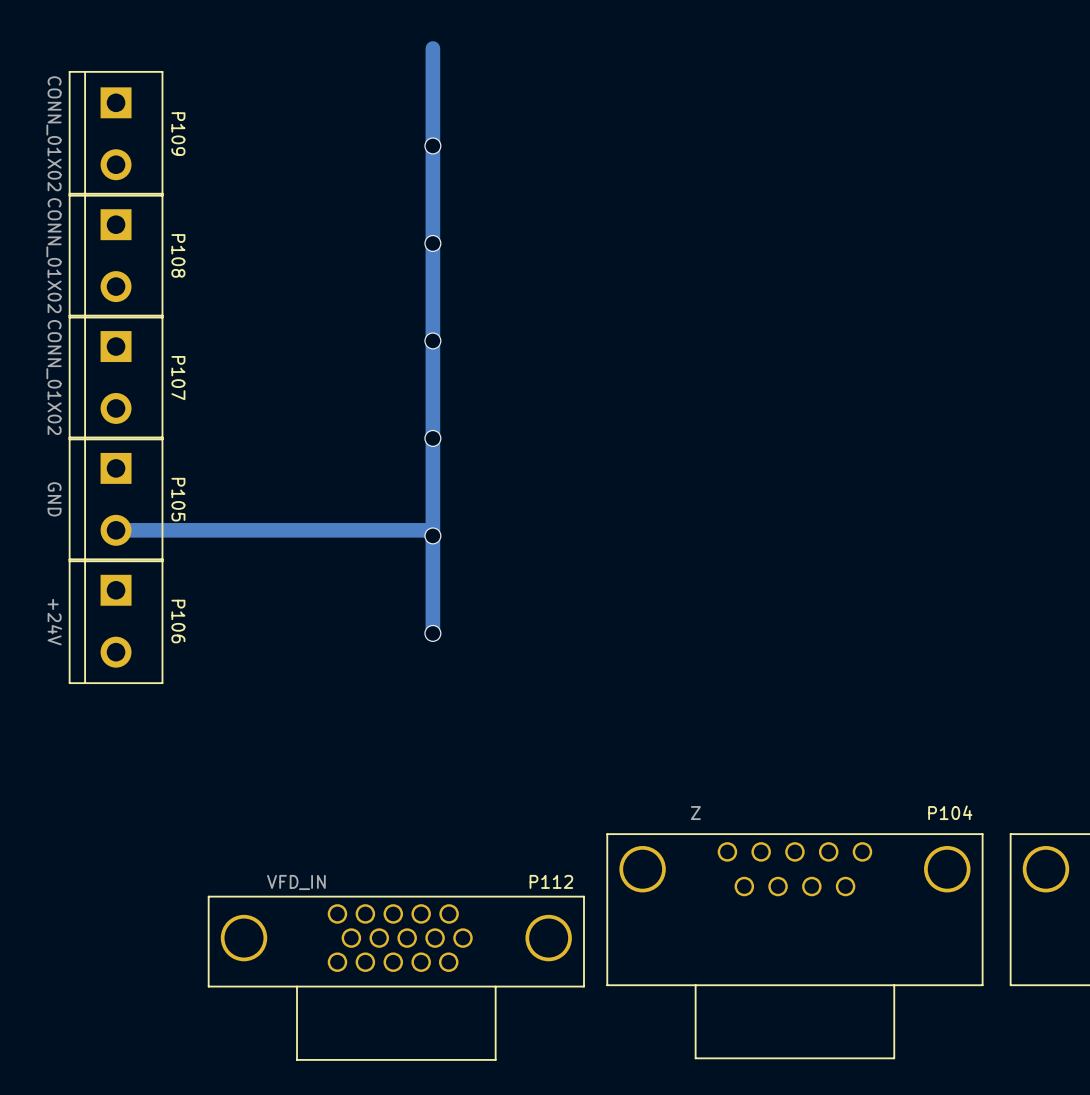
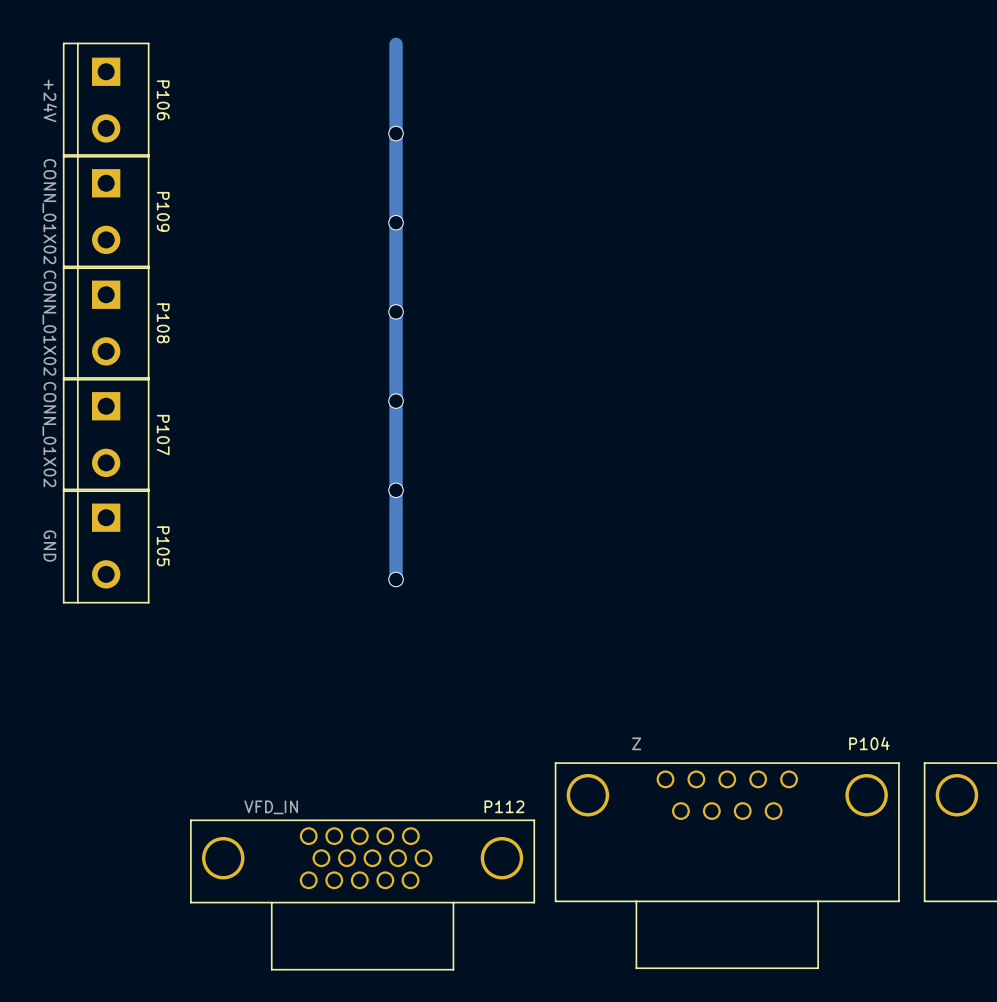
P109 position: (116, 133) -> (106, 211)
P108 position: (116, 255) -> (106, 323)
P107 position: (116, 377) -> (106, 434)
P105 position: (116, 499) -> (106, 546)
track: (116, 530) (427, 530) (432, 535) -> none
P106 position: (116, 621) -> (106, 100)

